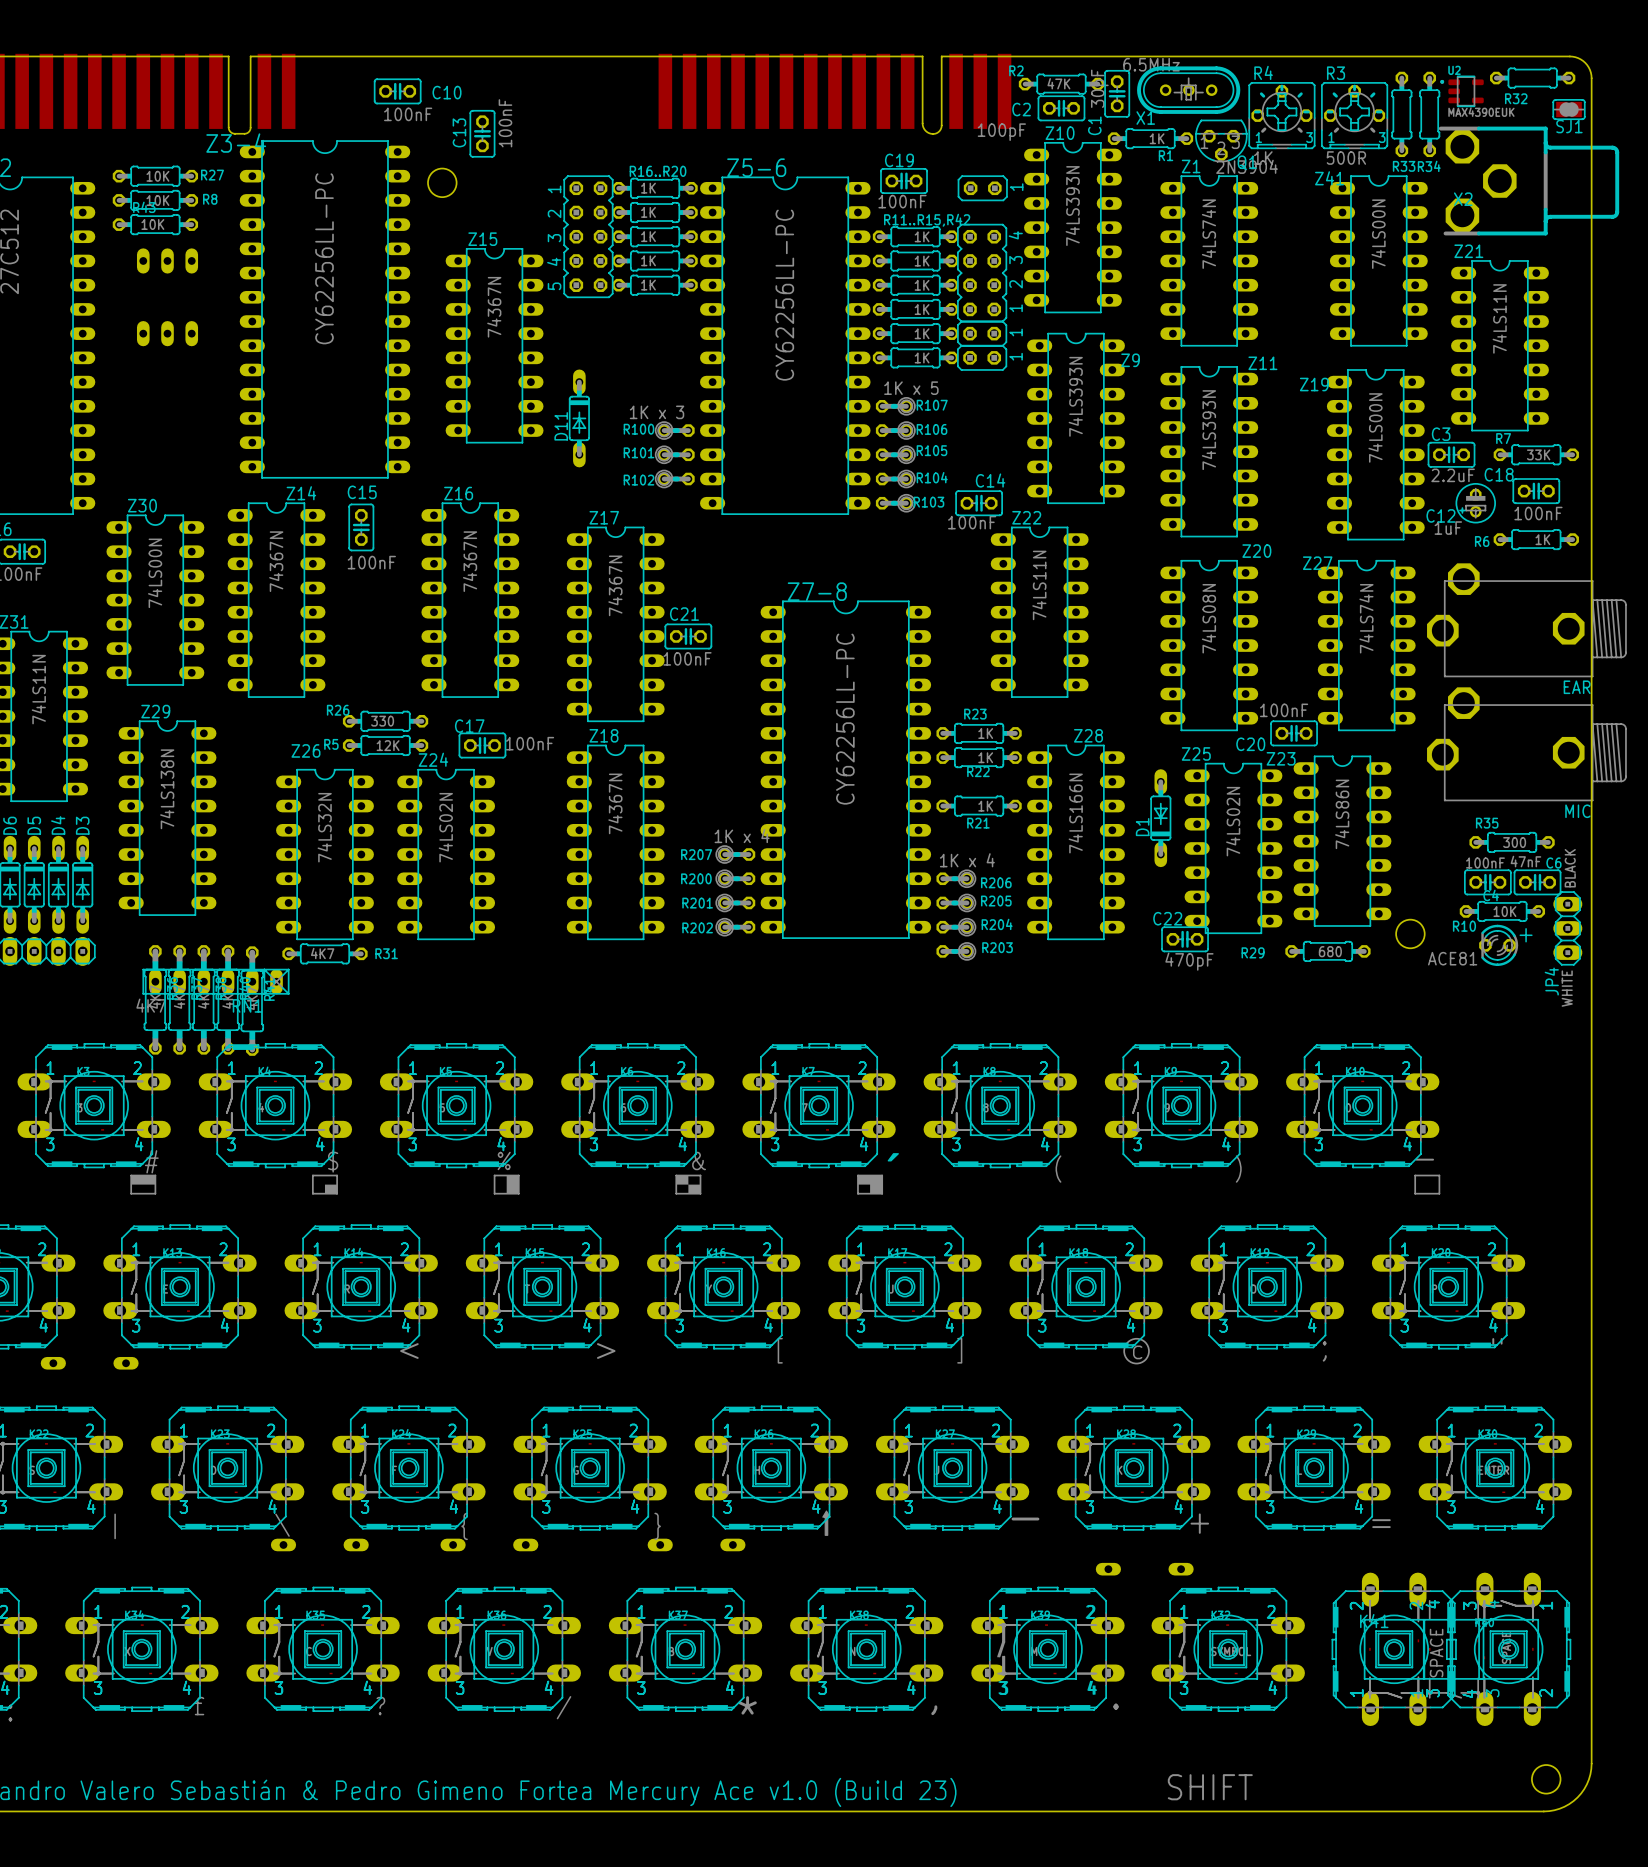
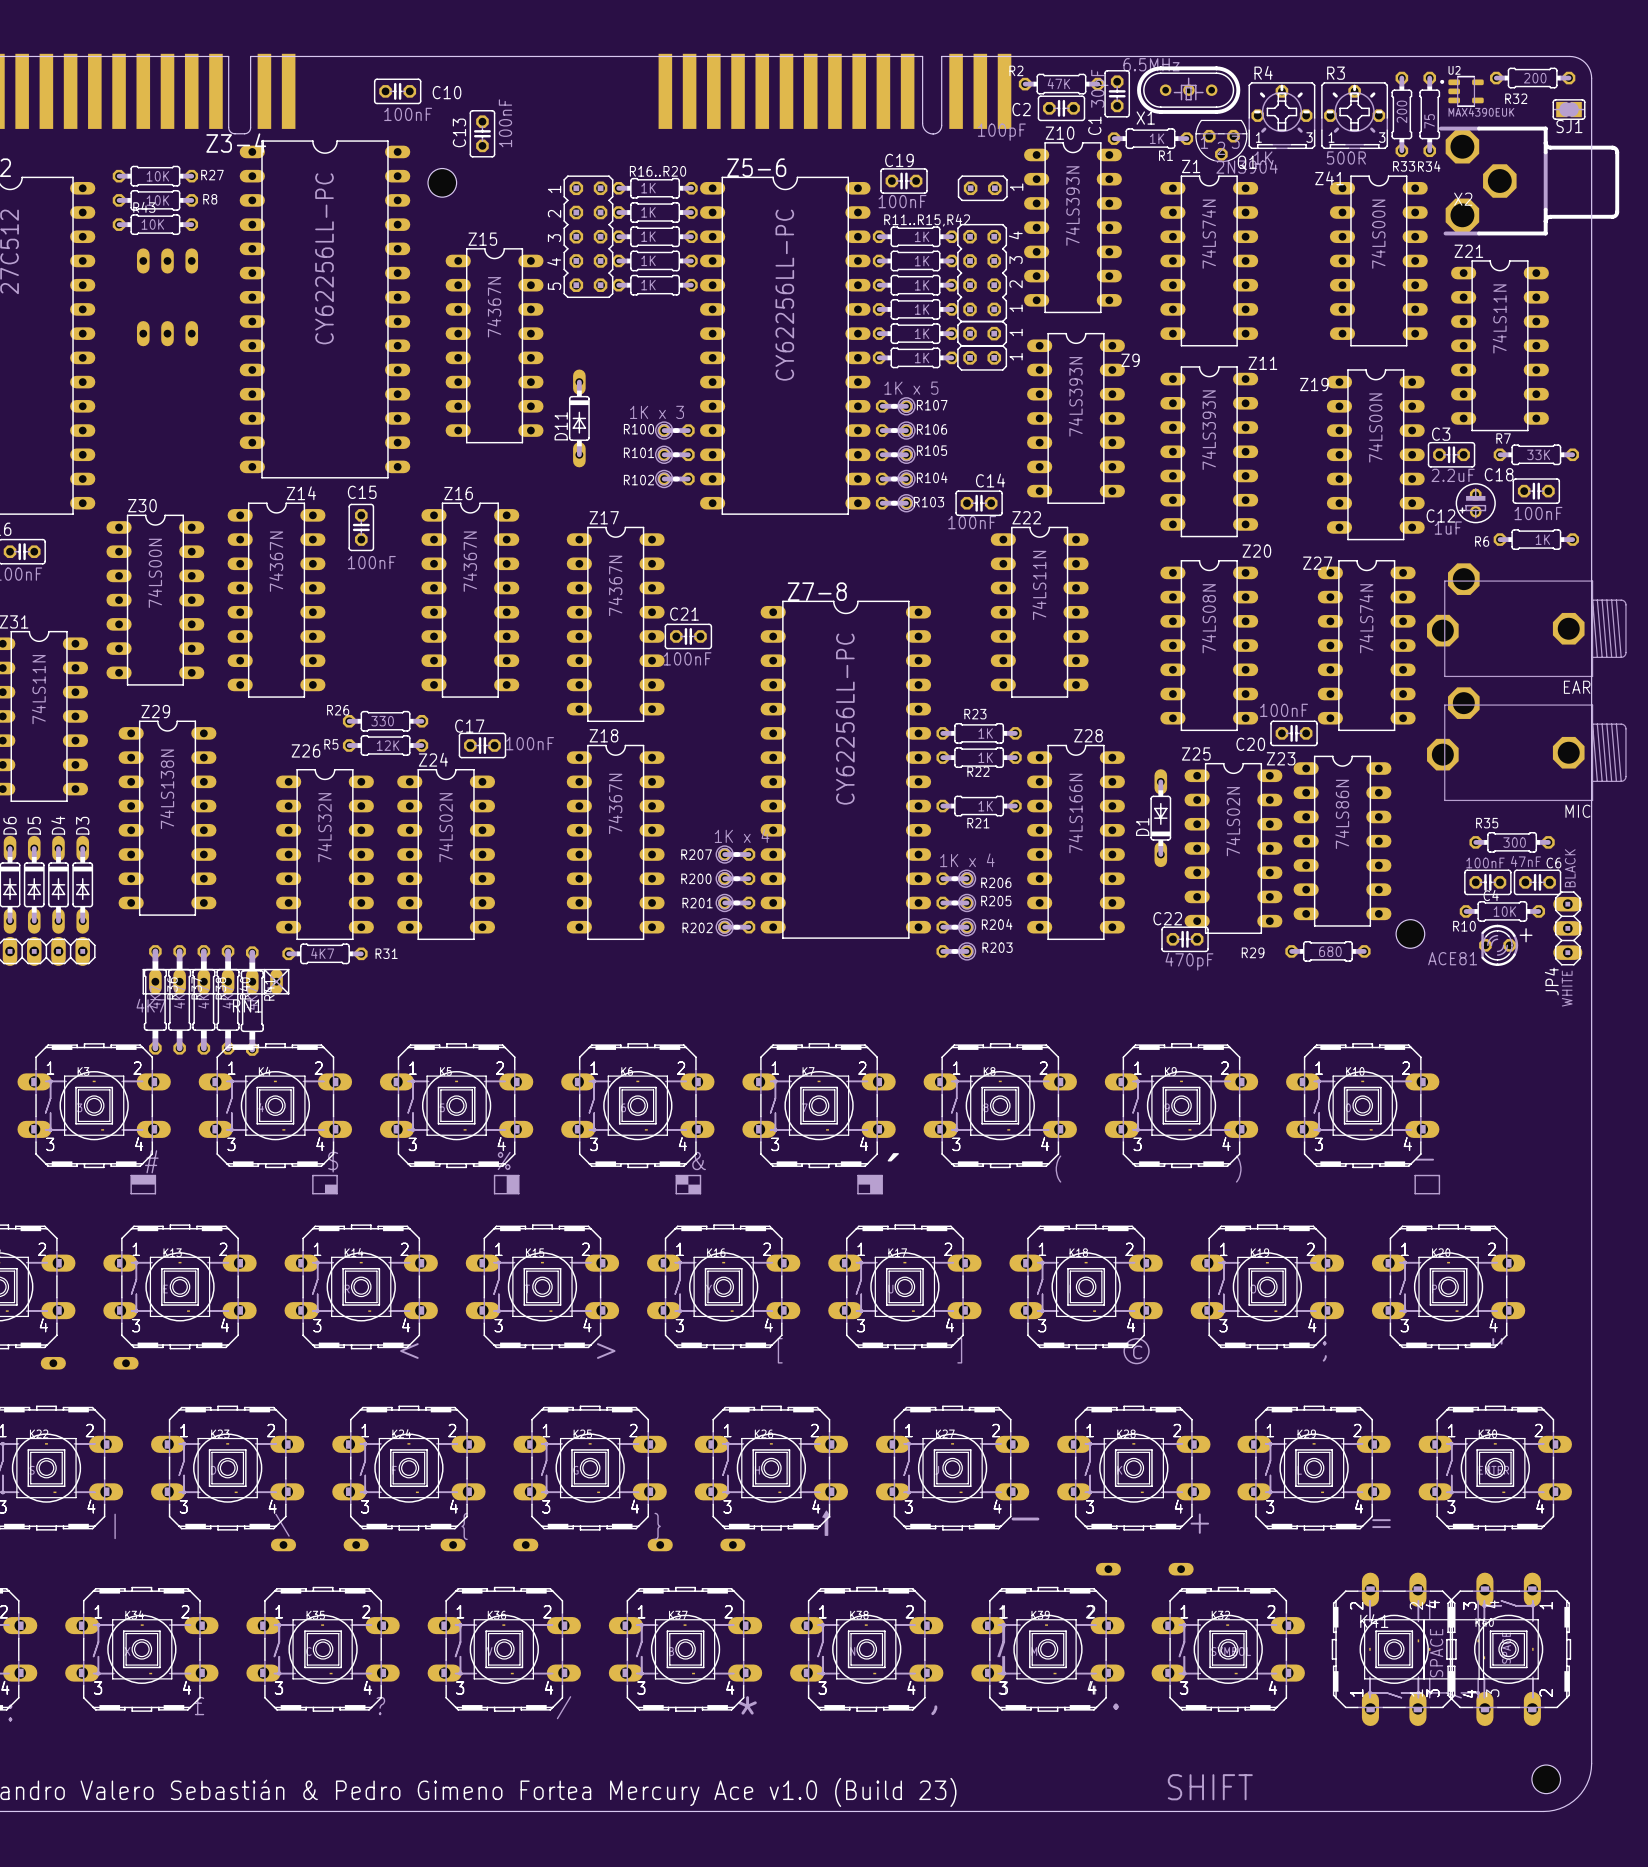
R32 value: none -> 200 (1535, 78)
R33 value: none -> 200 (1401, 111)
R34 value: none -> 75 (1429, 121)

